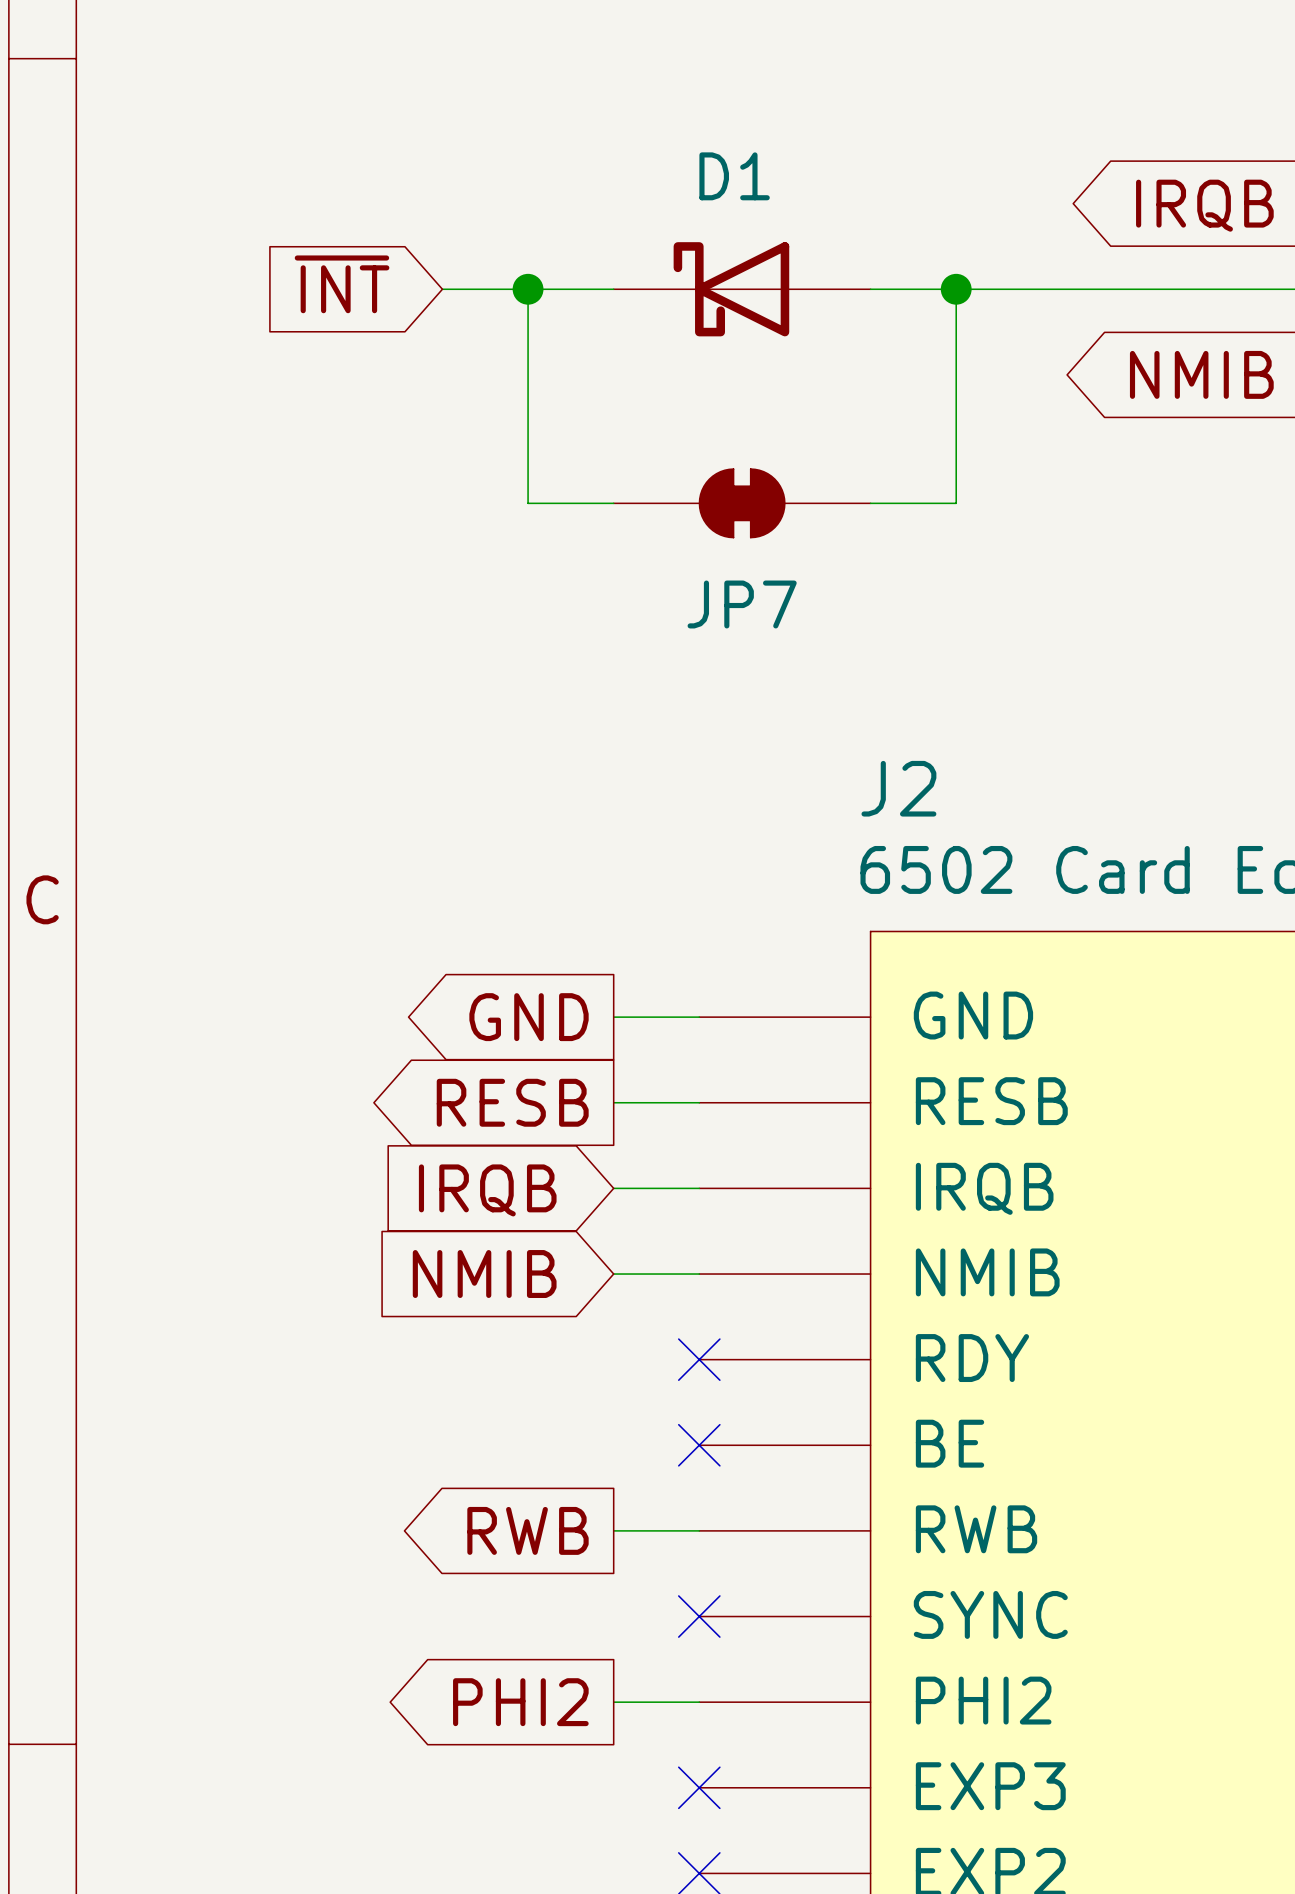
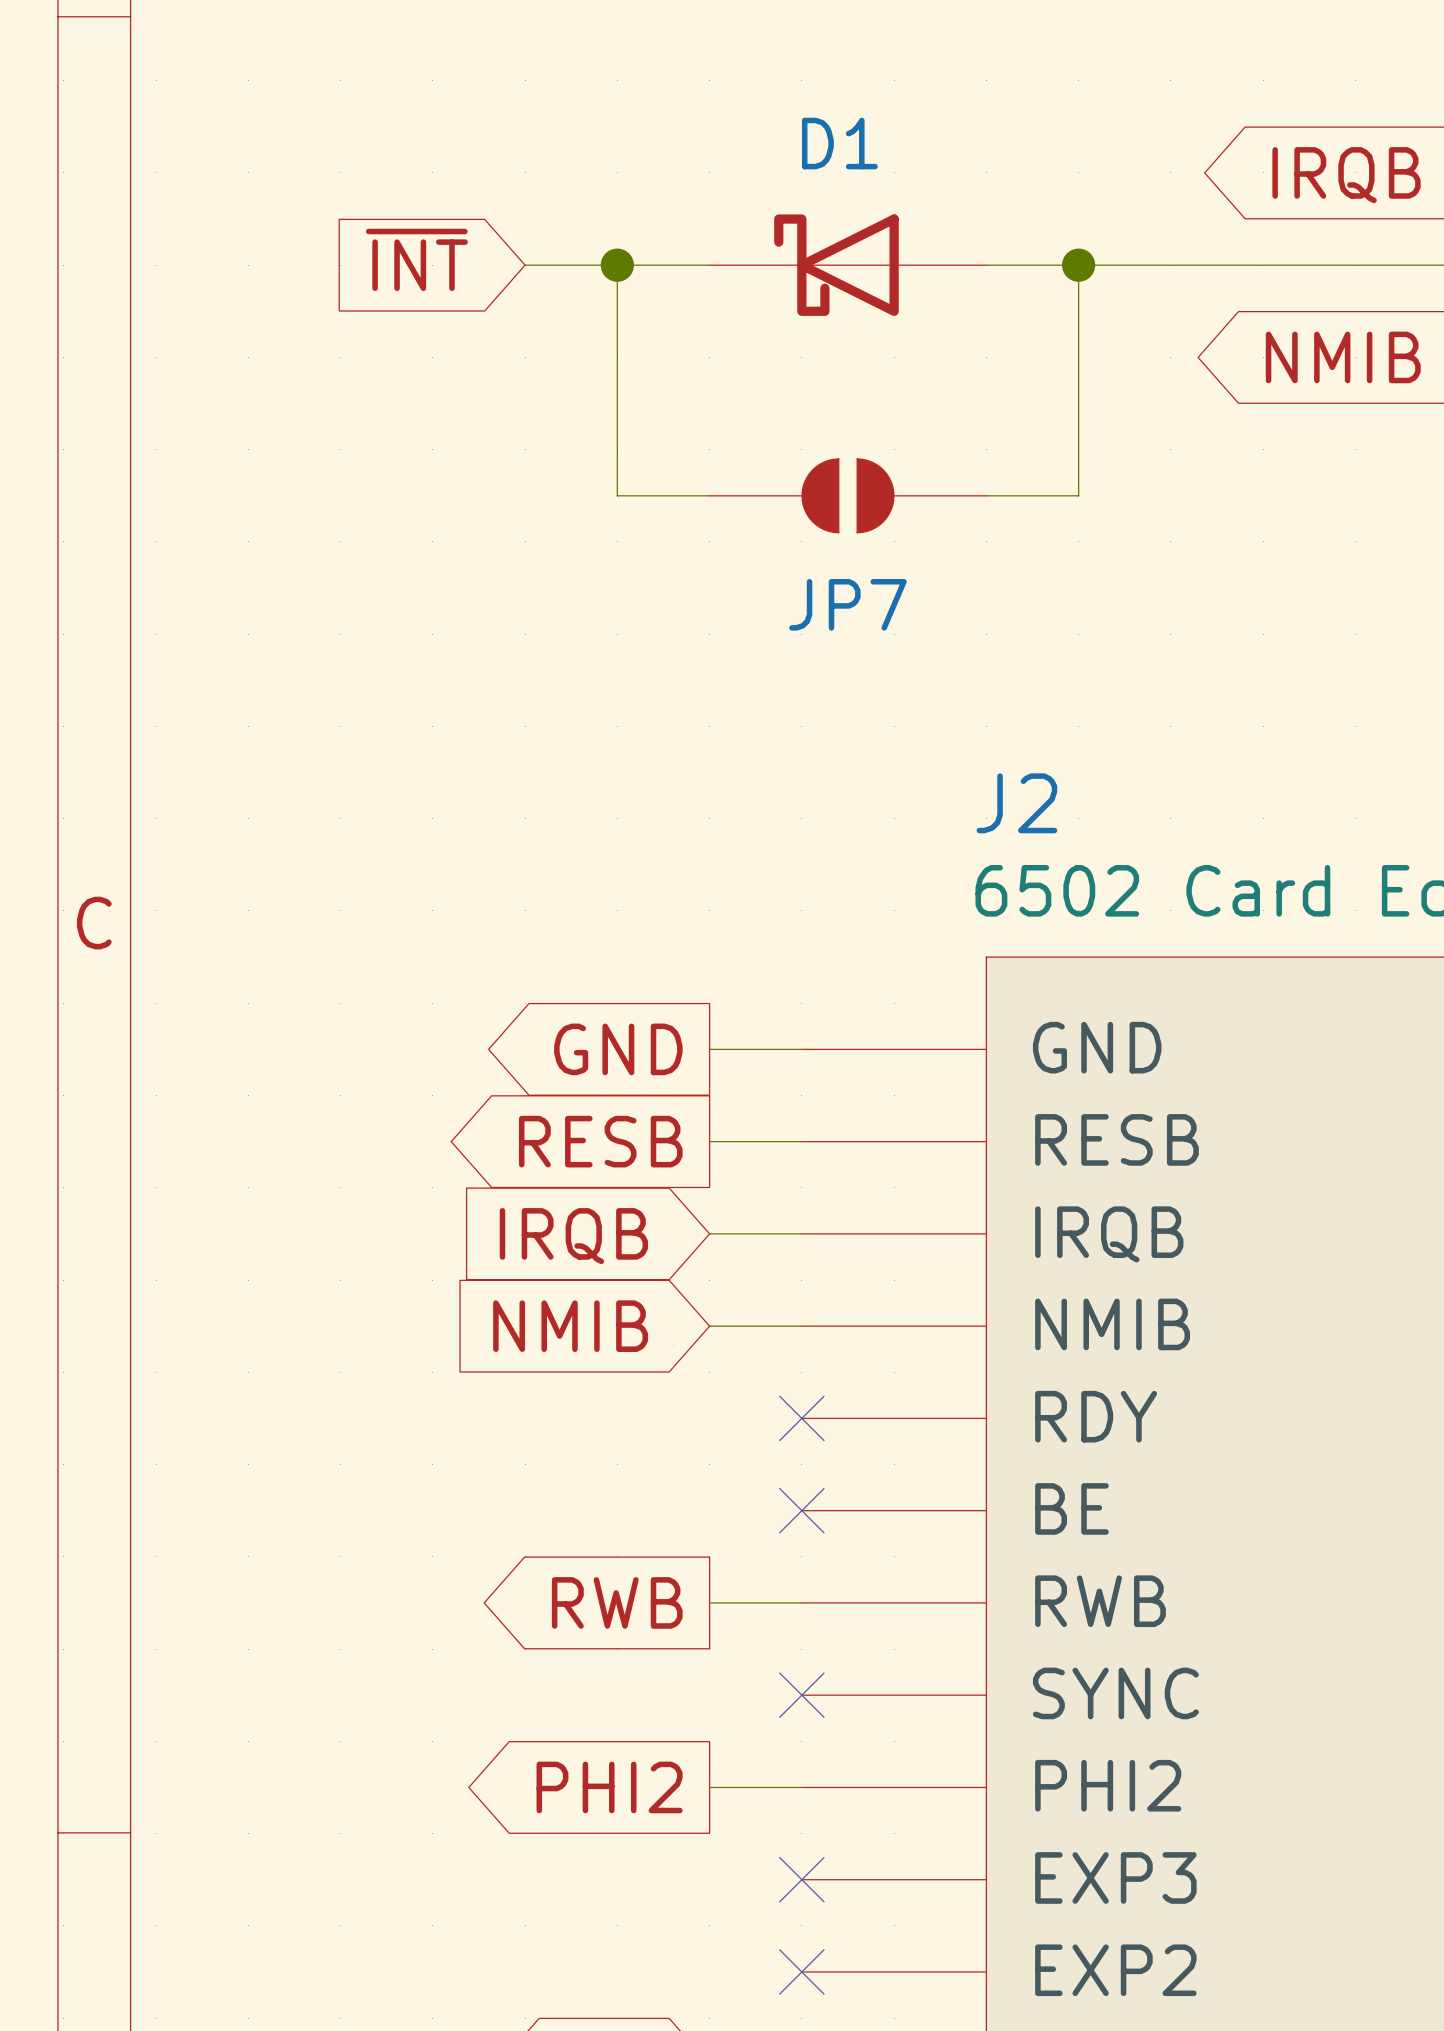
JP7 symbol: [613, 469, 871, 538] -> [709, 458, 987, 533]

